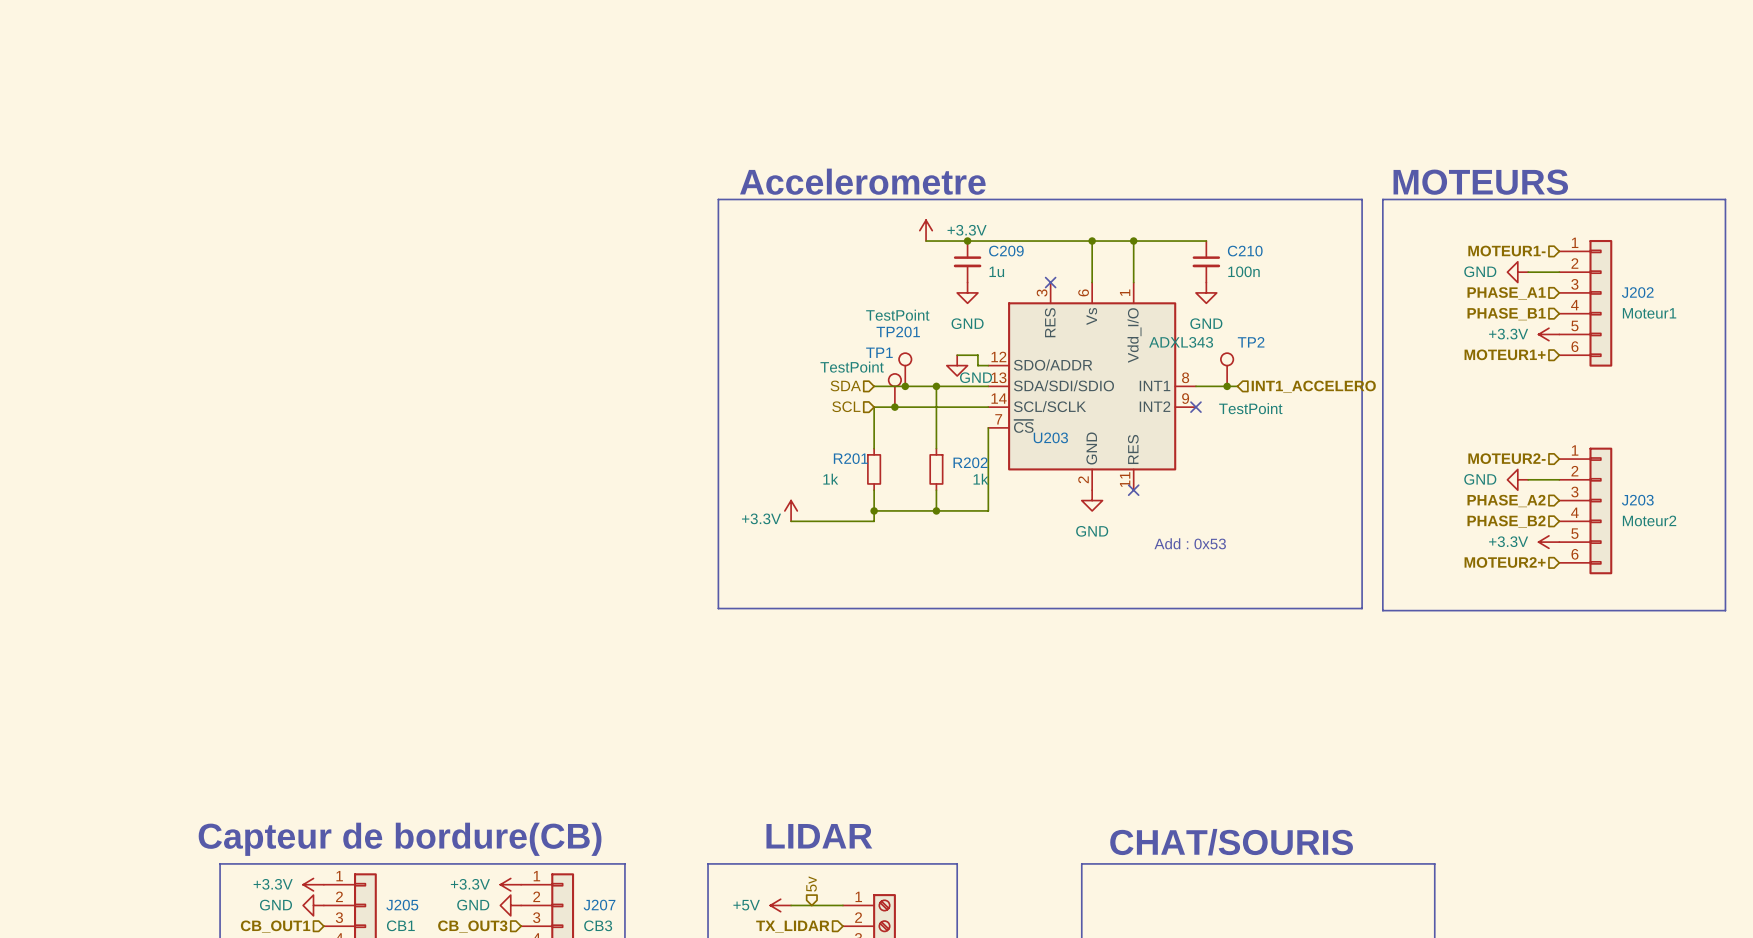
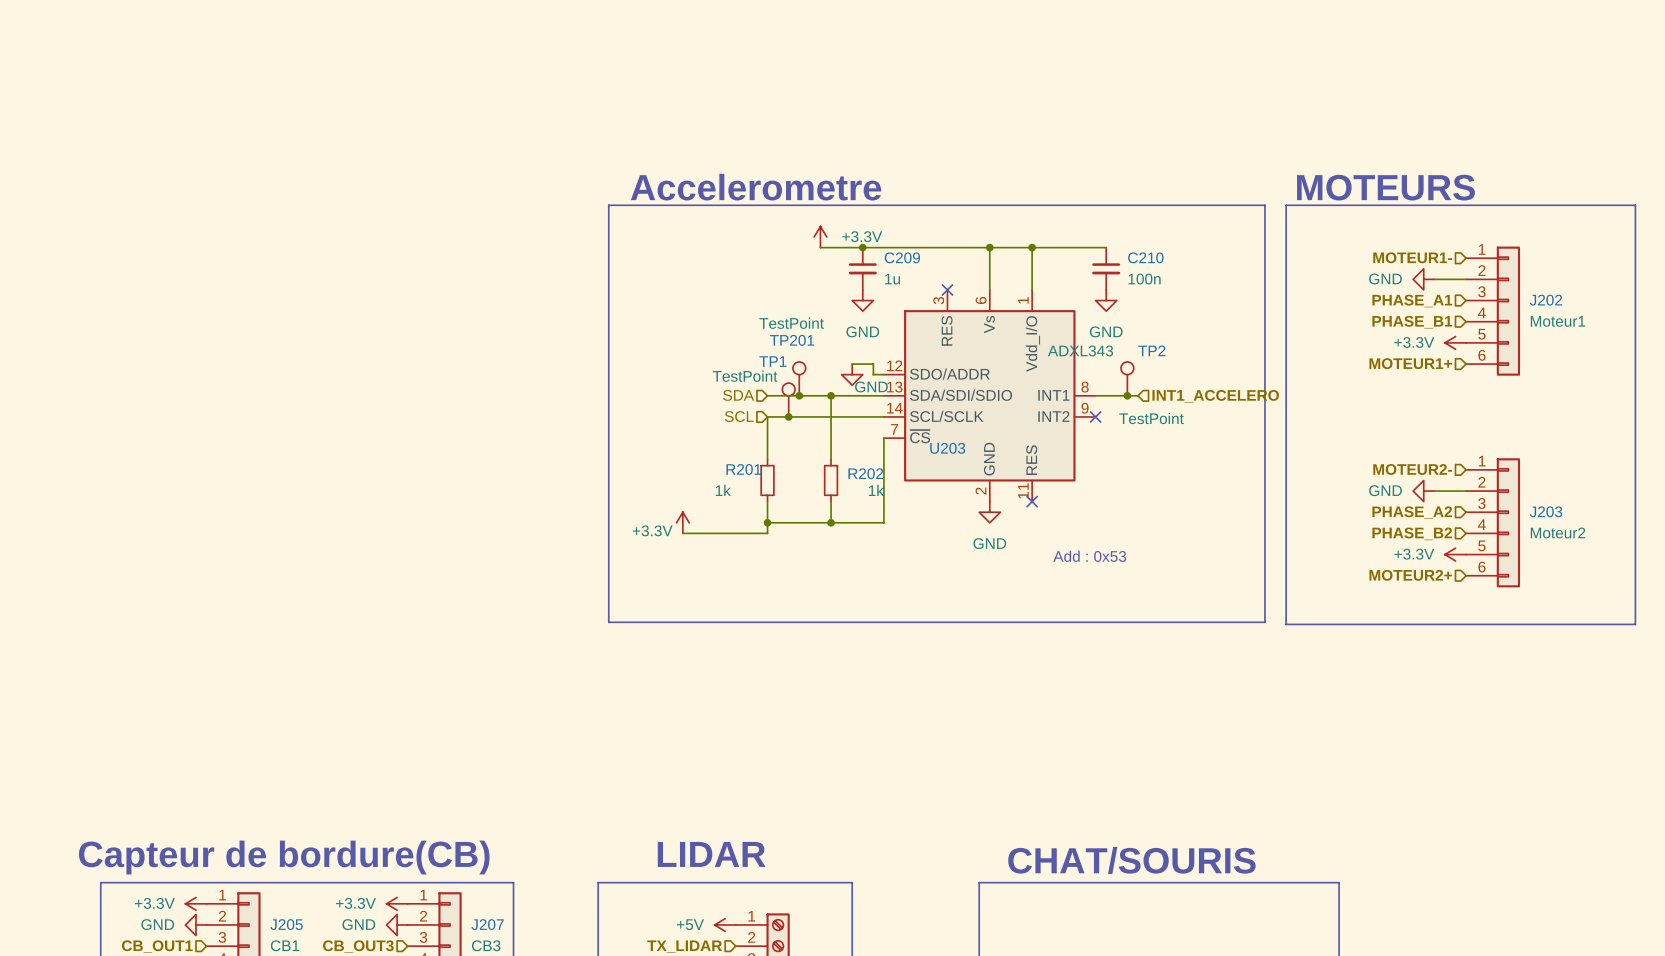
hierarchical label: 5v (811, 884) -> none
power symbol position: +5V (780, 905) -> +5V (725, 924)

